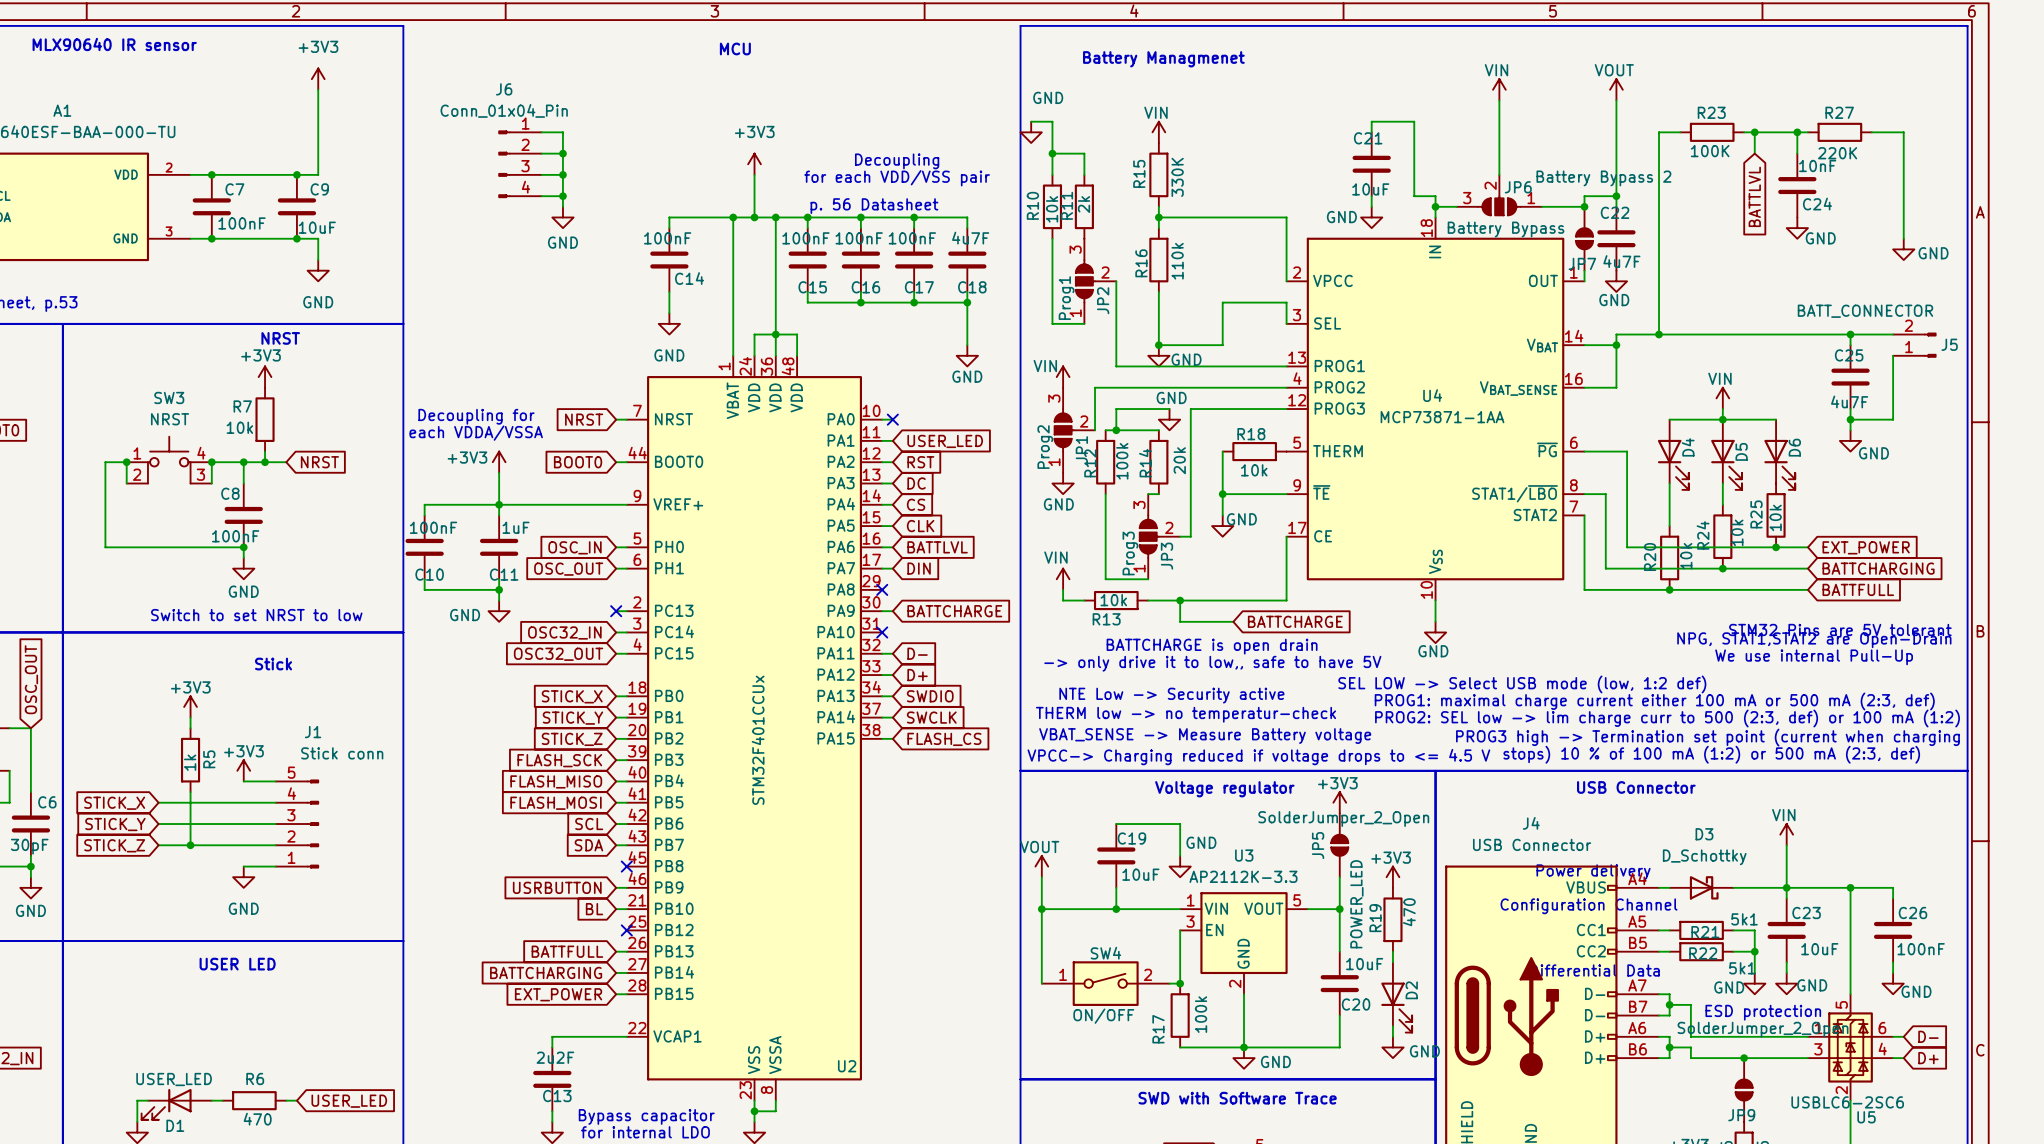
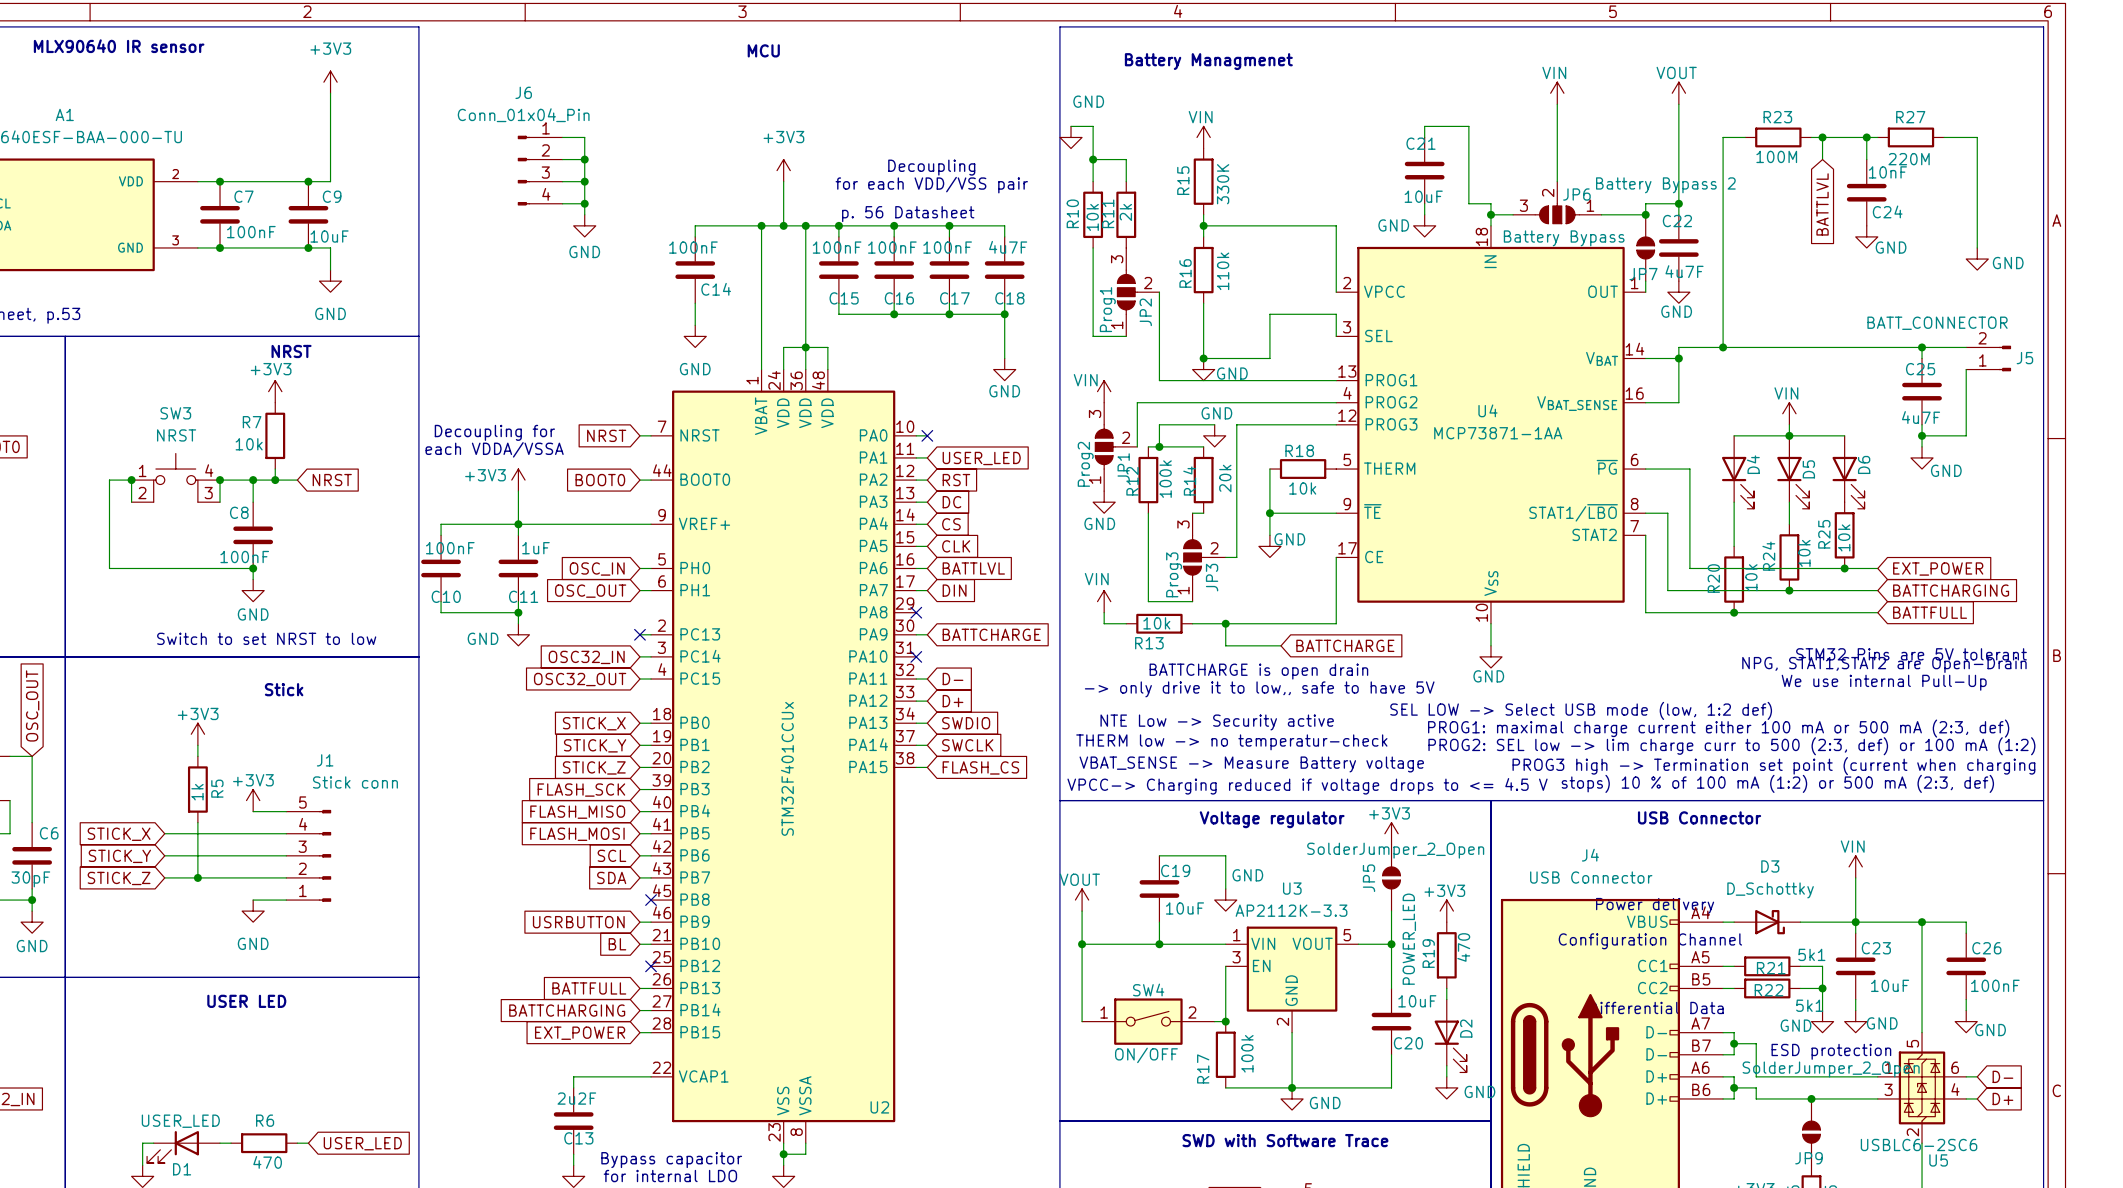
R23 value: 100K (1710, 151) -> 100M (1776, 156)
R27 value: 220K (1837, 153) -> 220M (1909, 159)

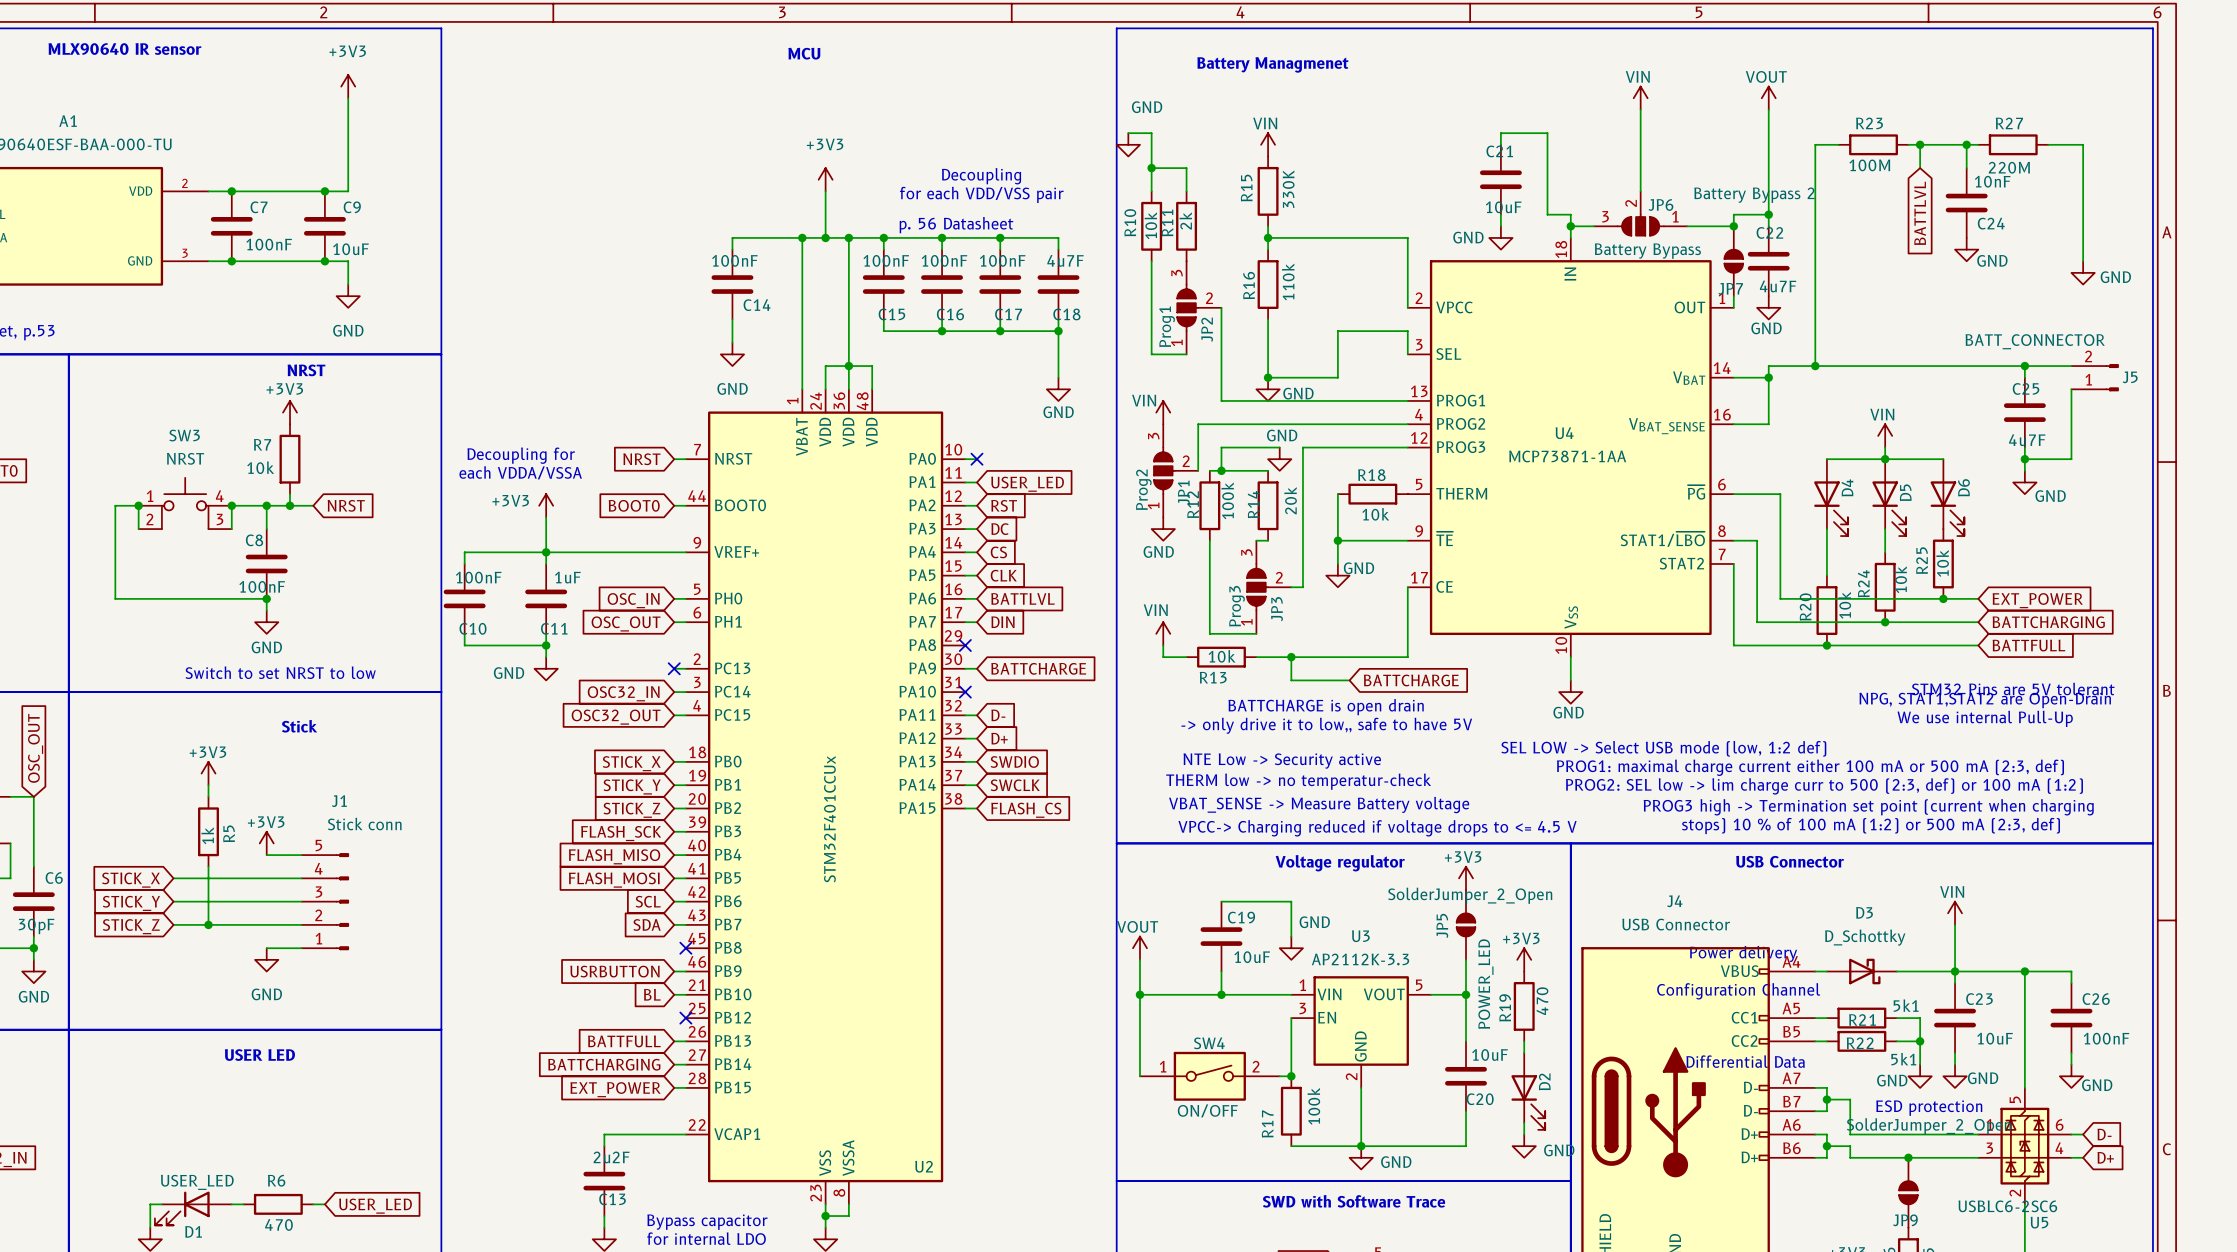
wire: (562, 137) (584, 137) (584, 214) -> none
wire: (562, 159) (584, 159) -> none
junction: (584, 159) -> none
J6: Conn_01x04_Pin (540, 170) -> none
wire: (562, 181) (584, 181) -> none
junction: (584, 181) -> none
wire: (562, 203) (584, 203) -> none
junction: (584, 203) -> none
power symbol: GND (584, 225) -> none

